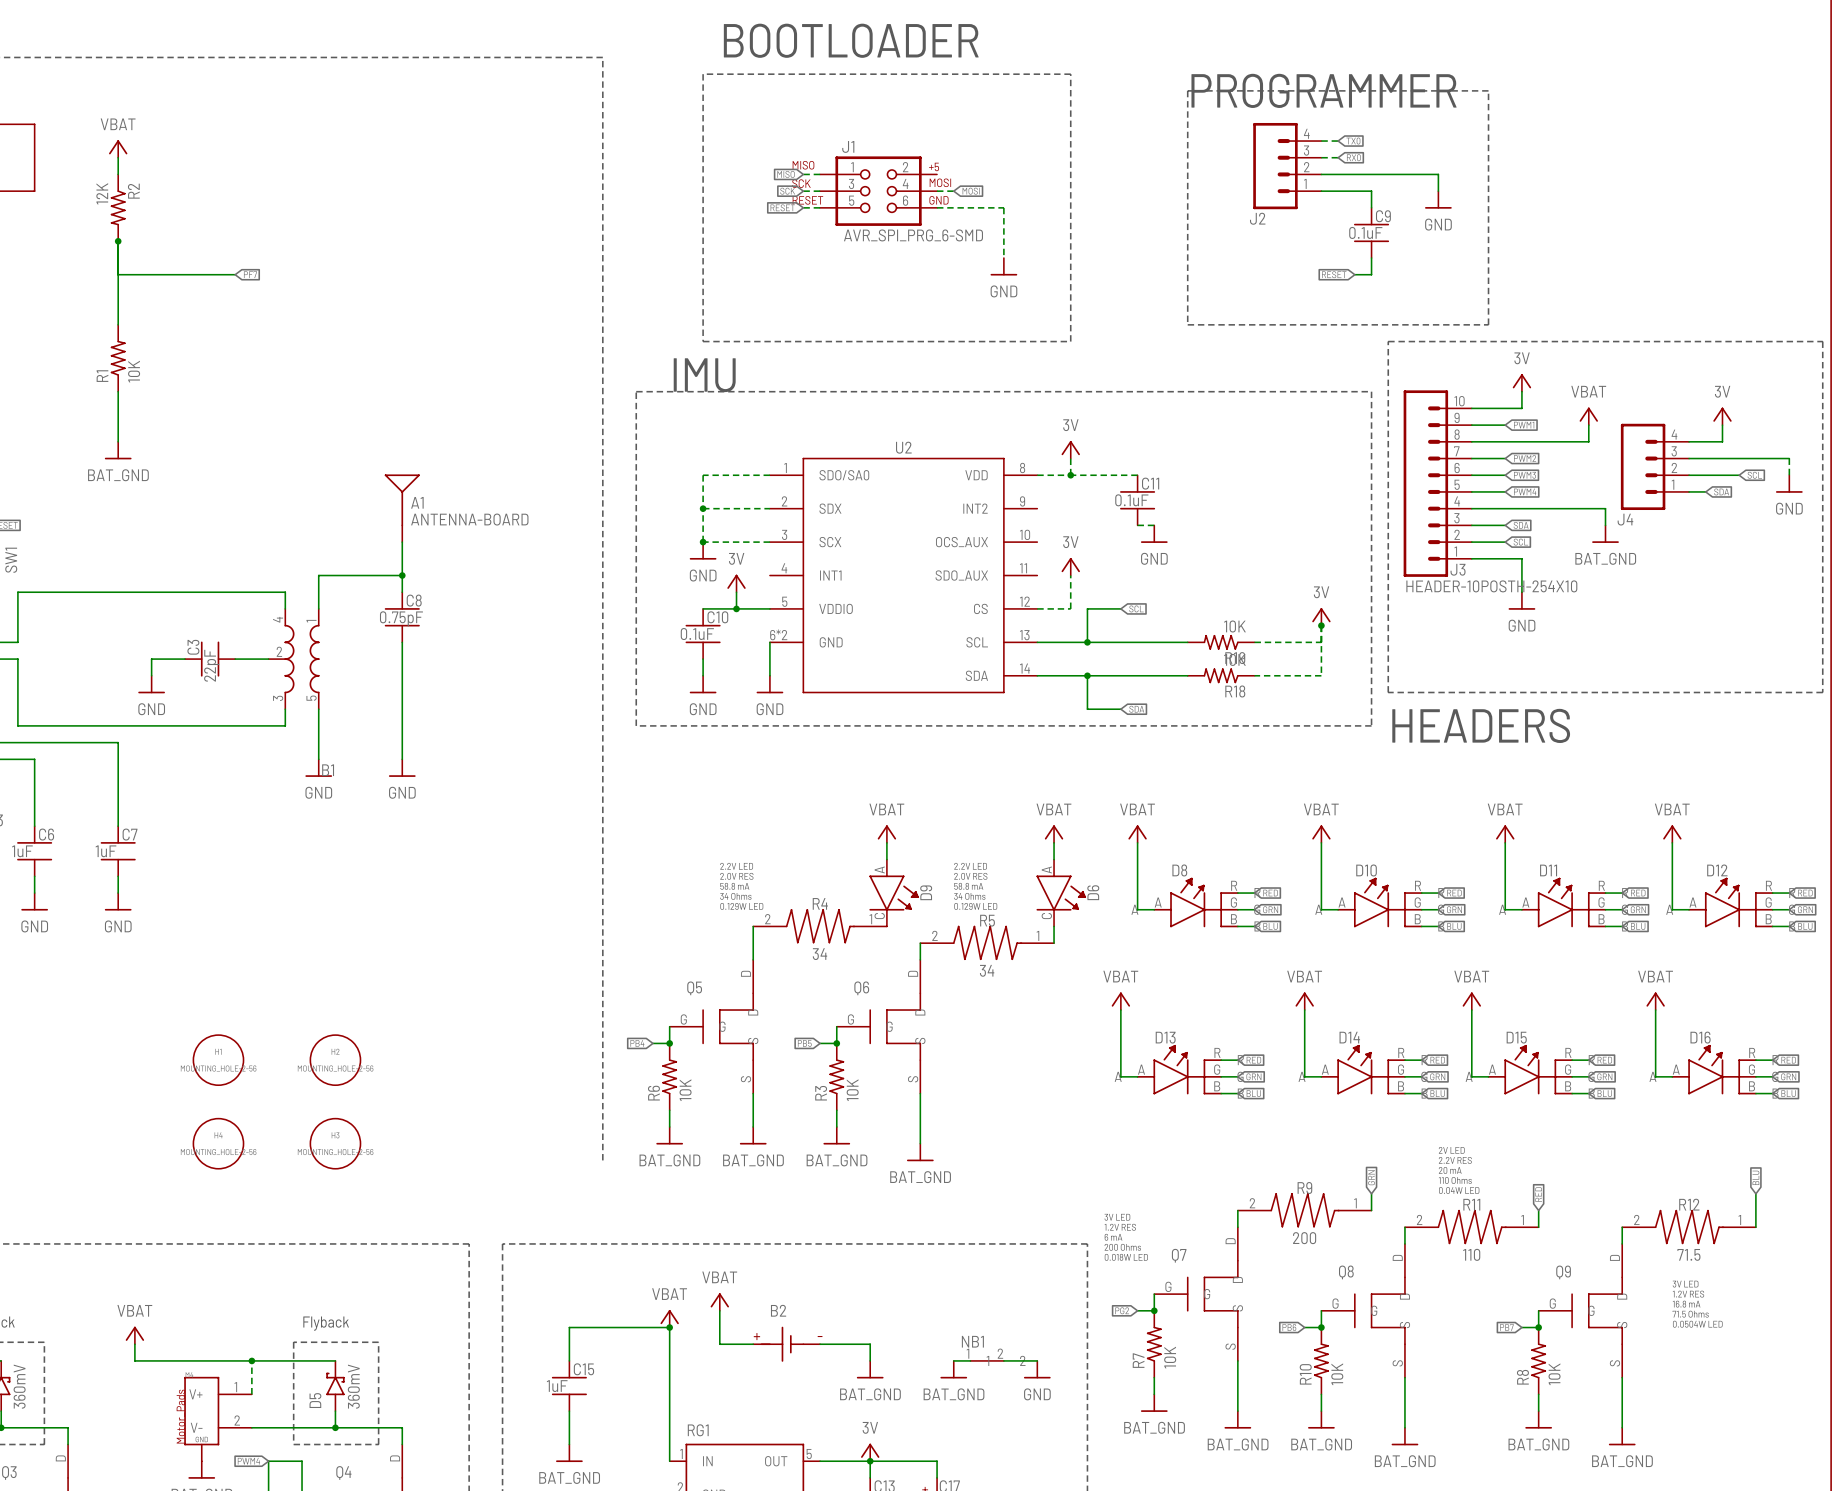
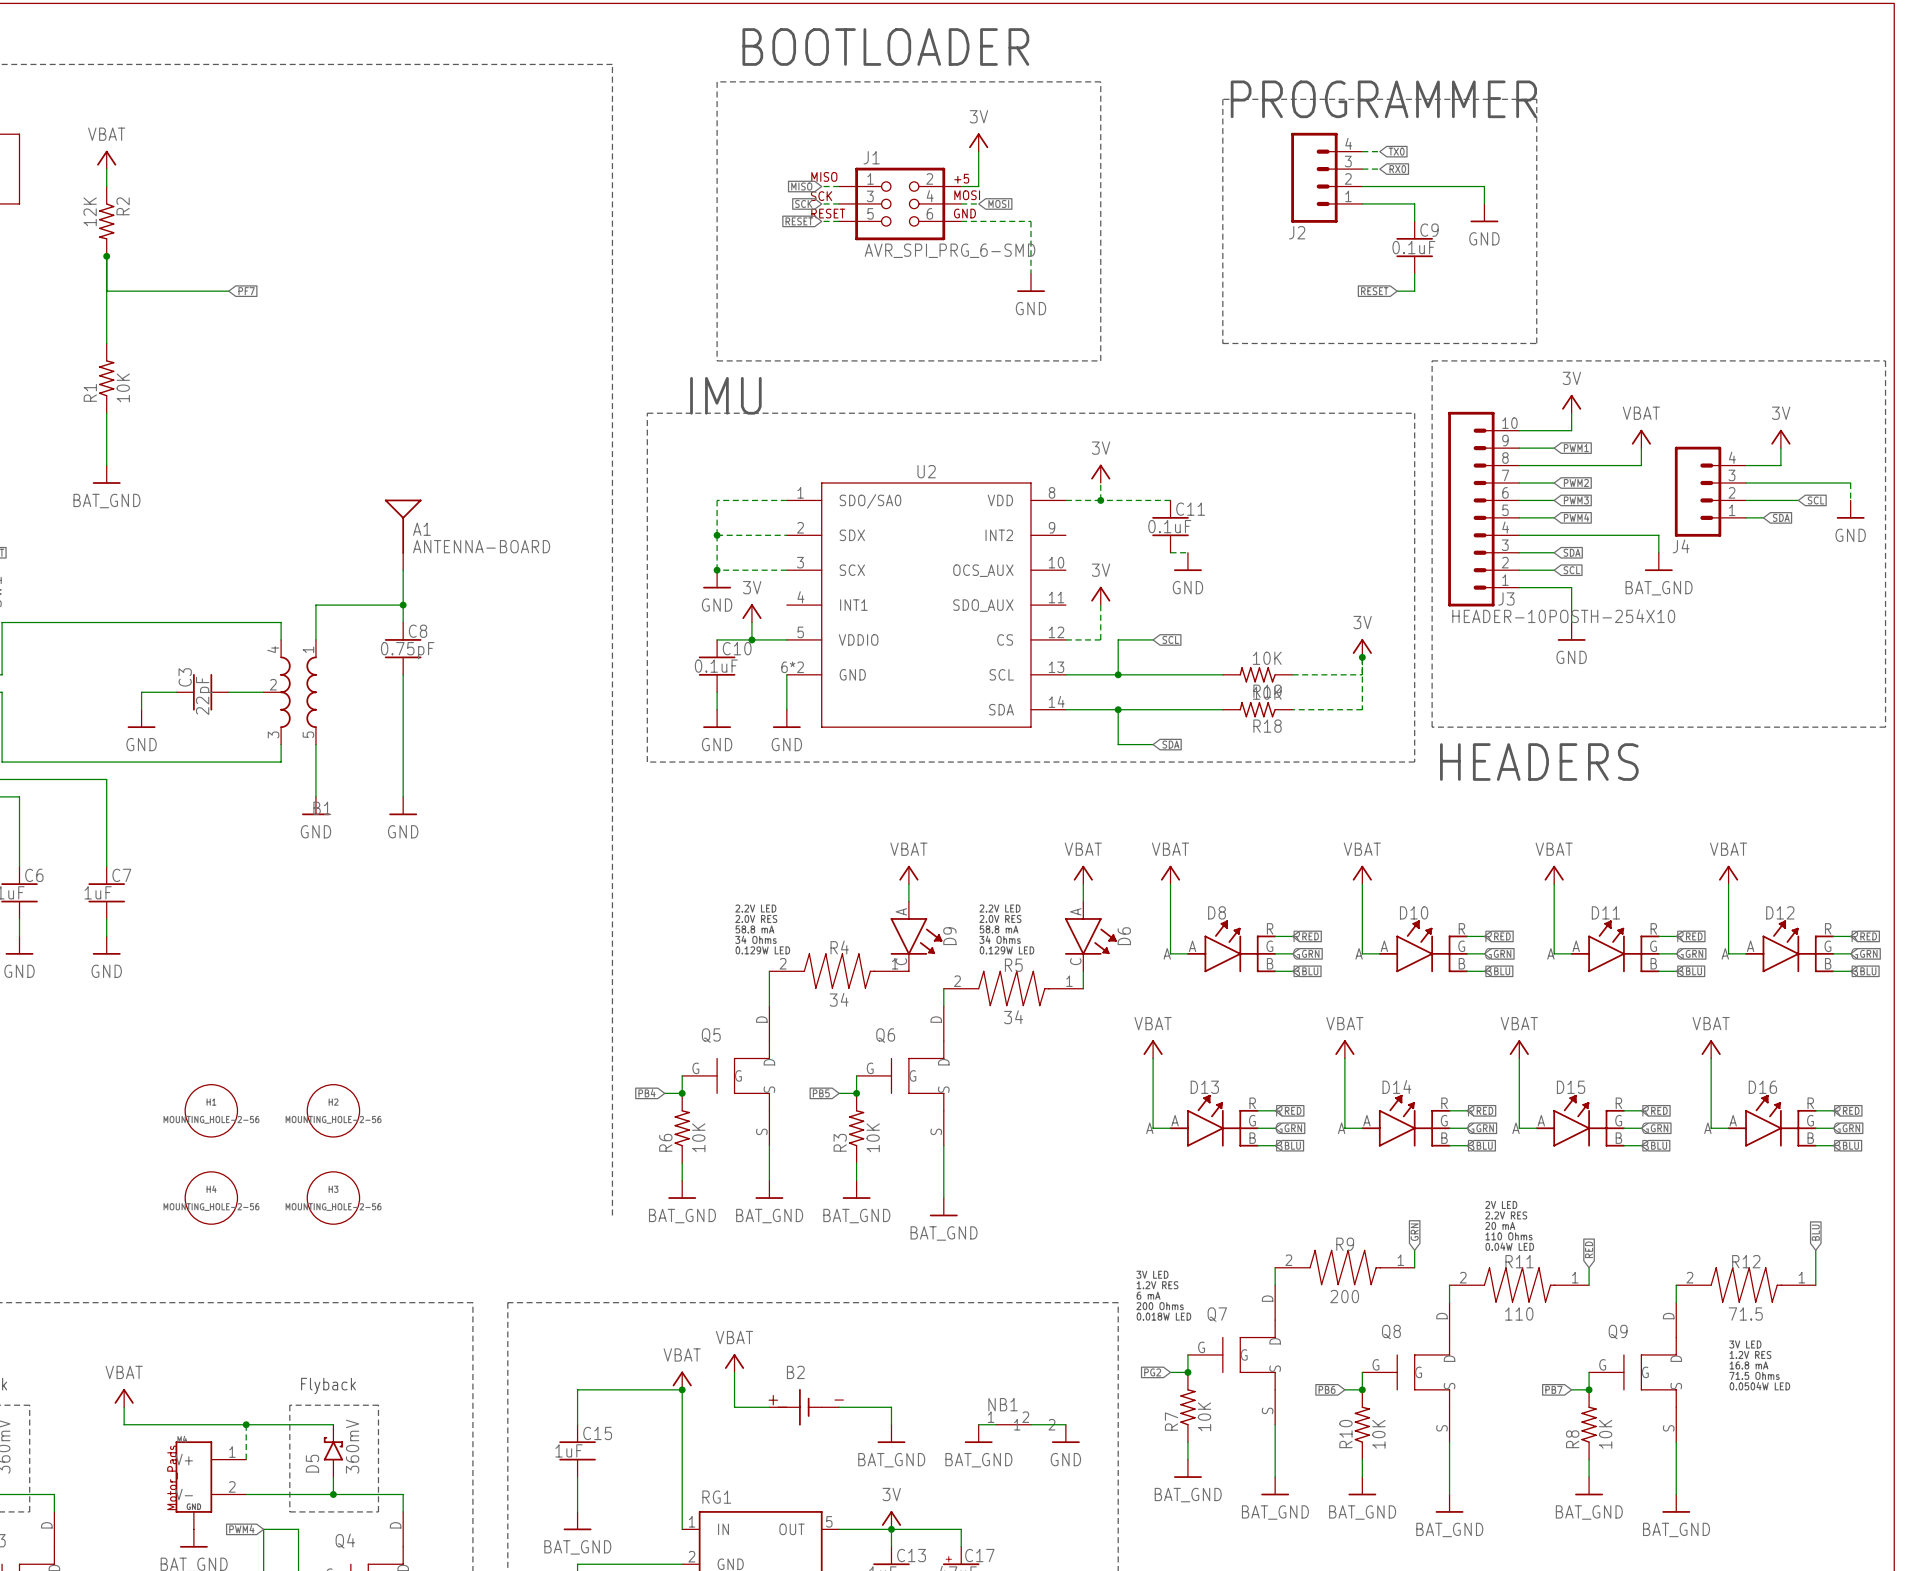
power symbol: none -> 3V (978, 142)
wire: none -> (978, 151) (978, 186) (961, 186)

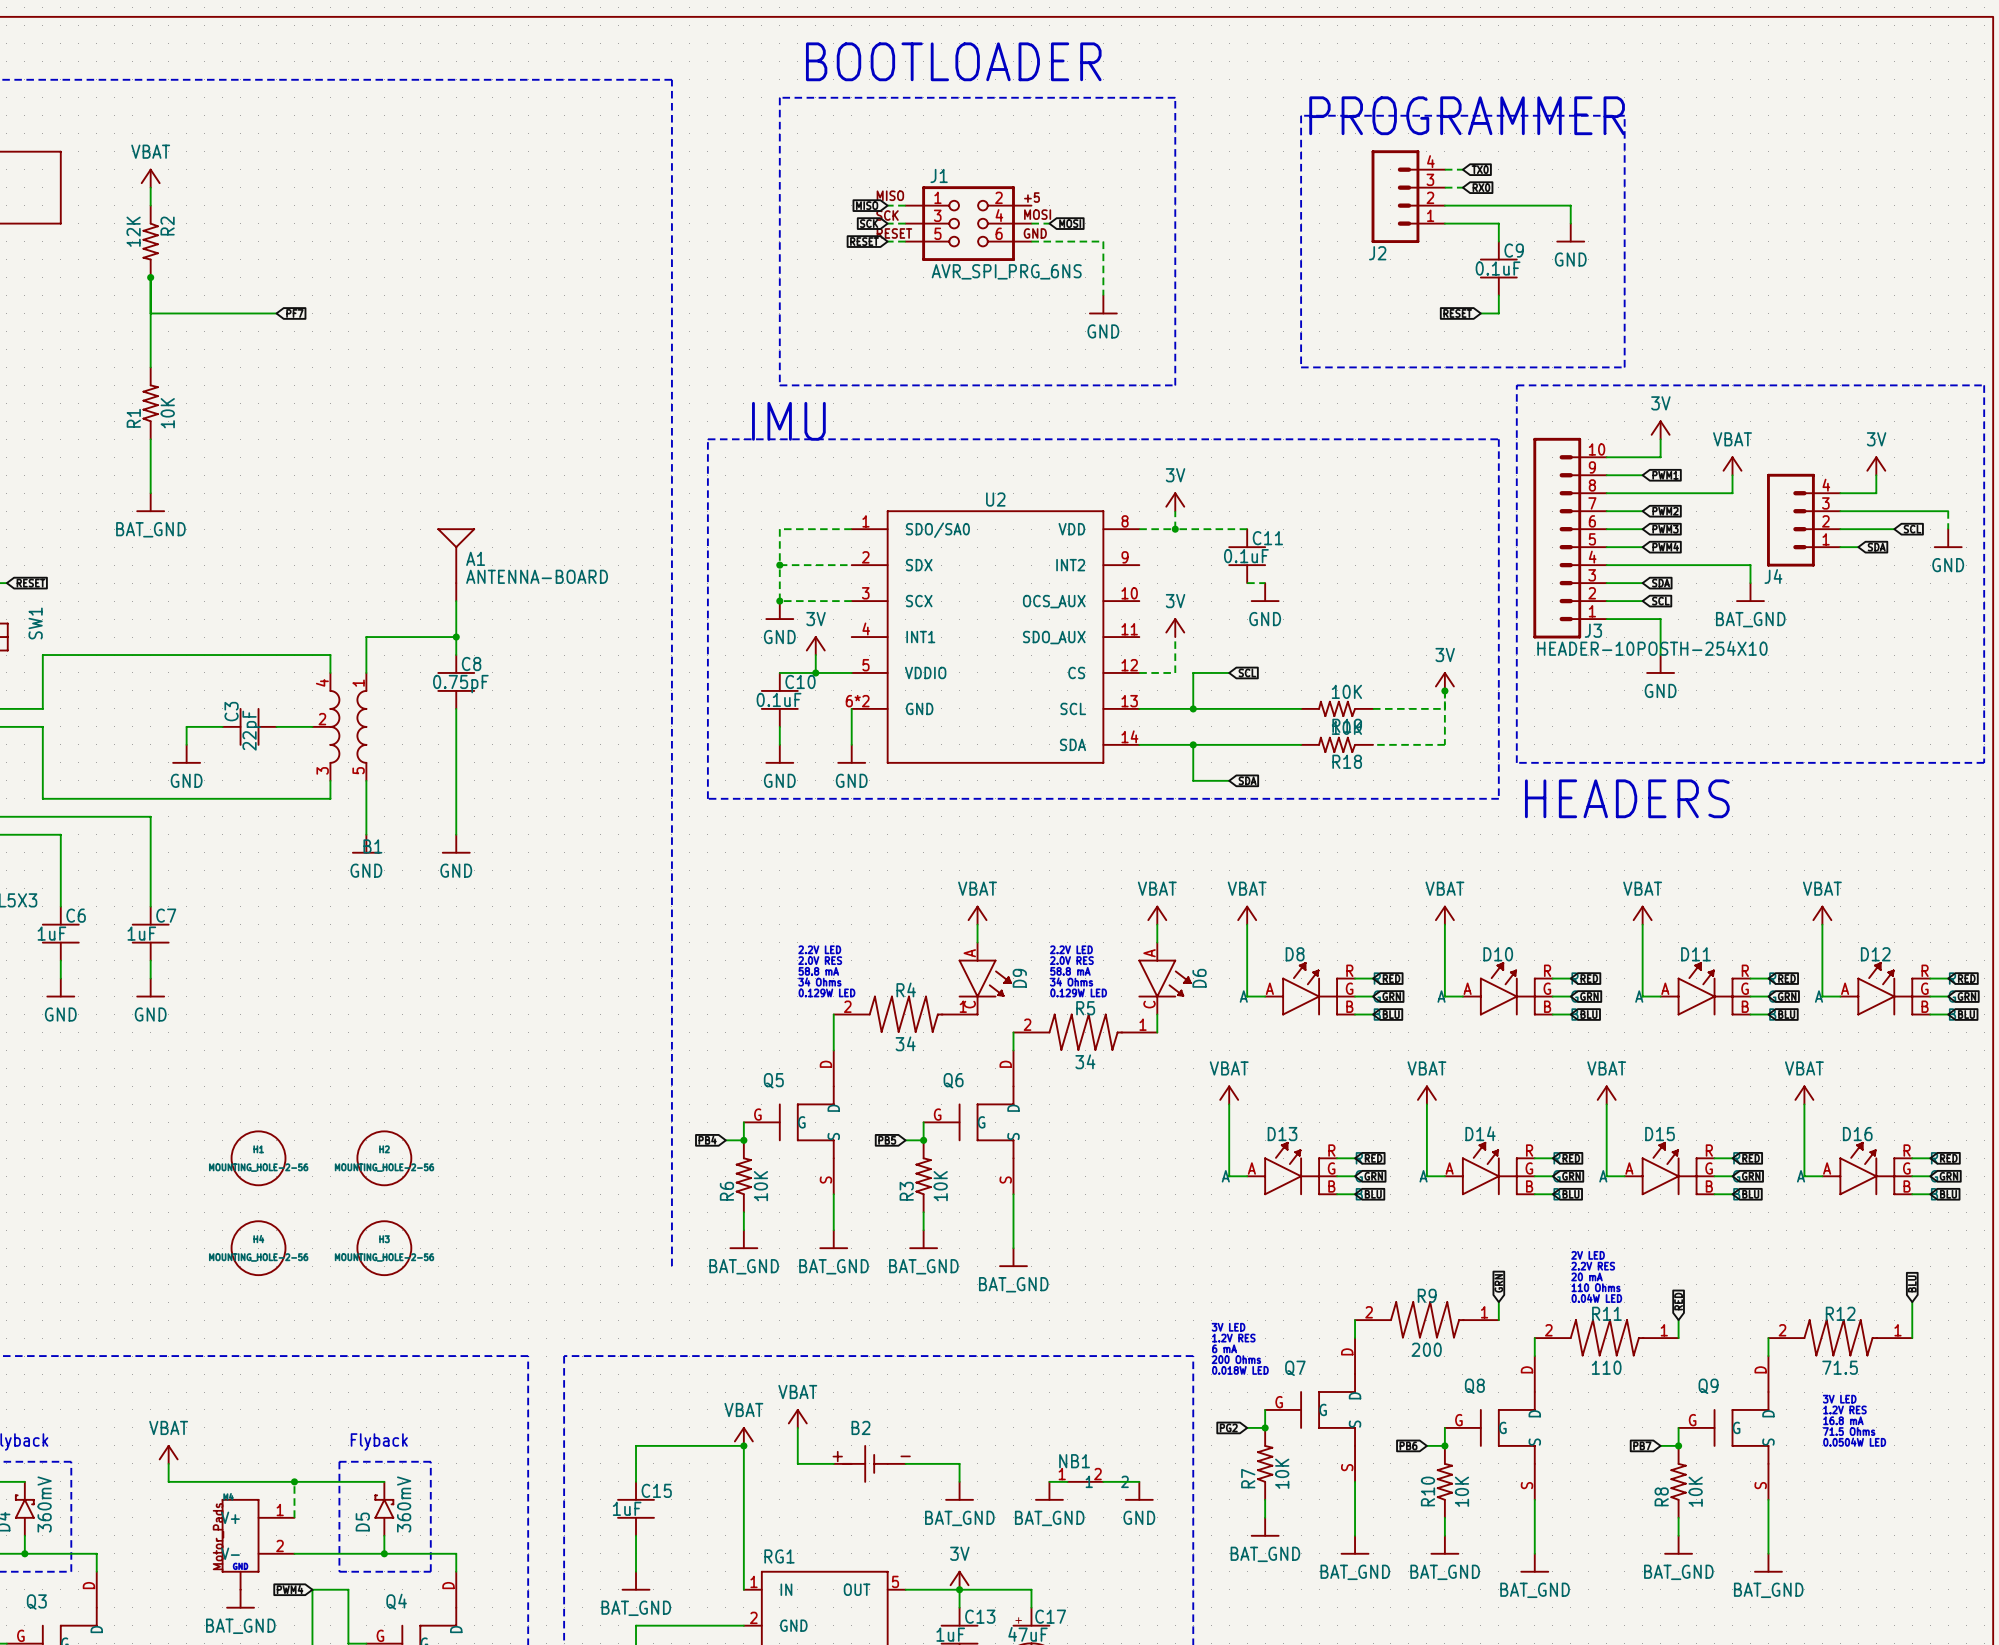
power symbol: 3V (978, 142) -> none
wire: (978, 151) (978, 186) (961, 186) -> none
J1 value: AVR_SPI_PRG_6-SMD (950, 250) -> AVR_SPI_PRG_6NS (1006, 271)

